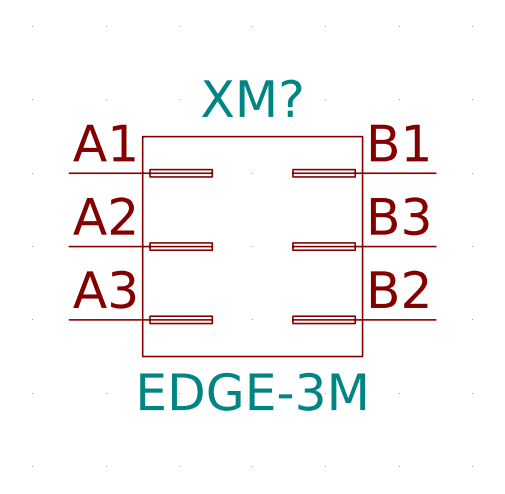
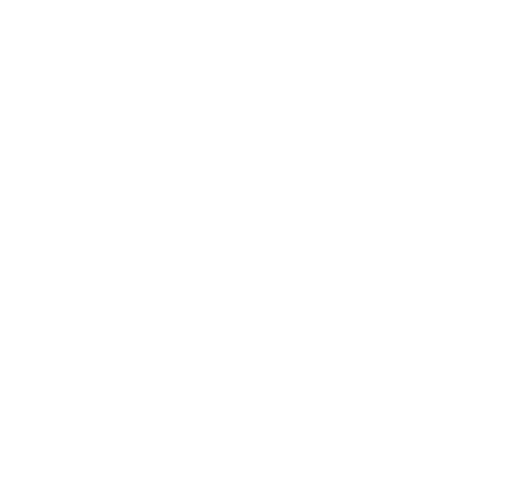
XM?: EDGE-3M (252, 246) -> none

